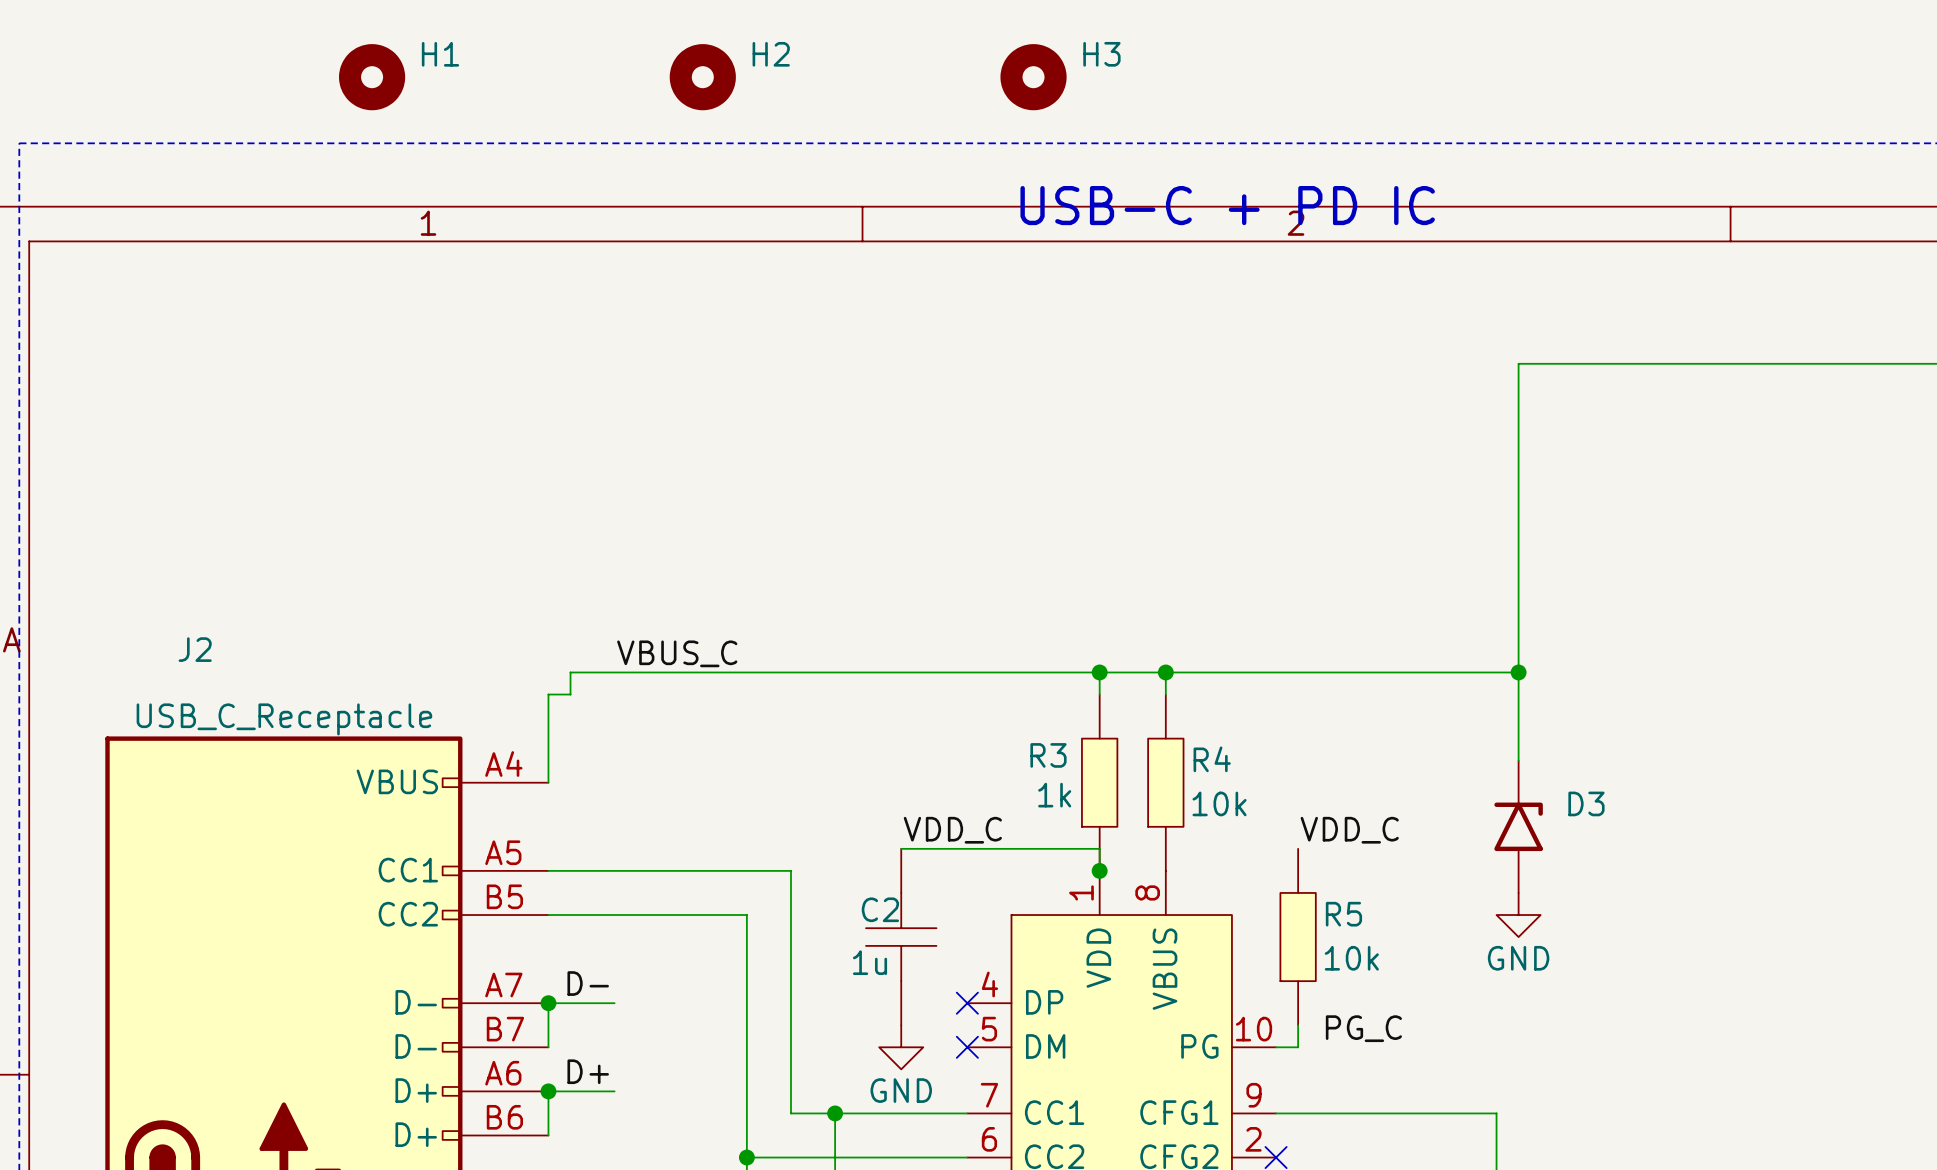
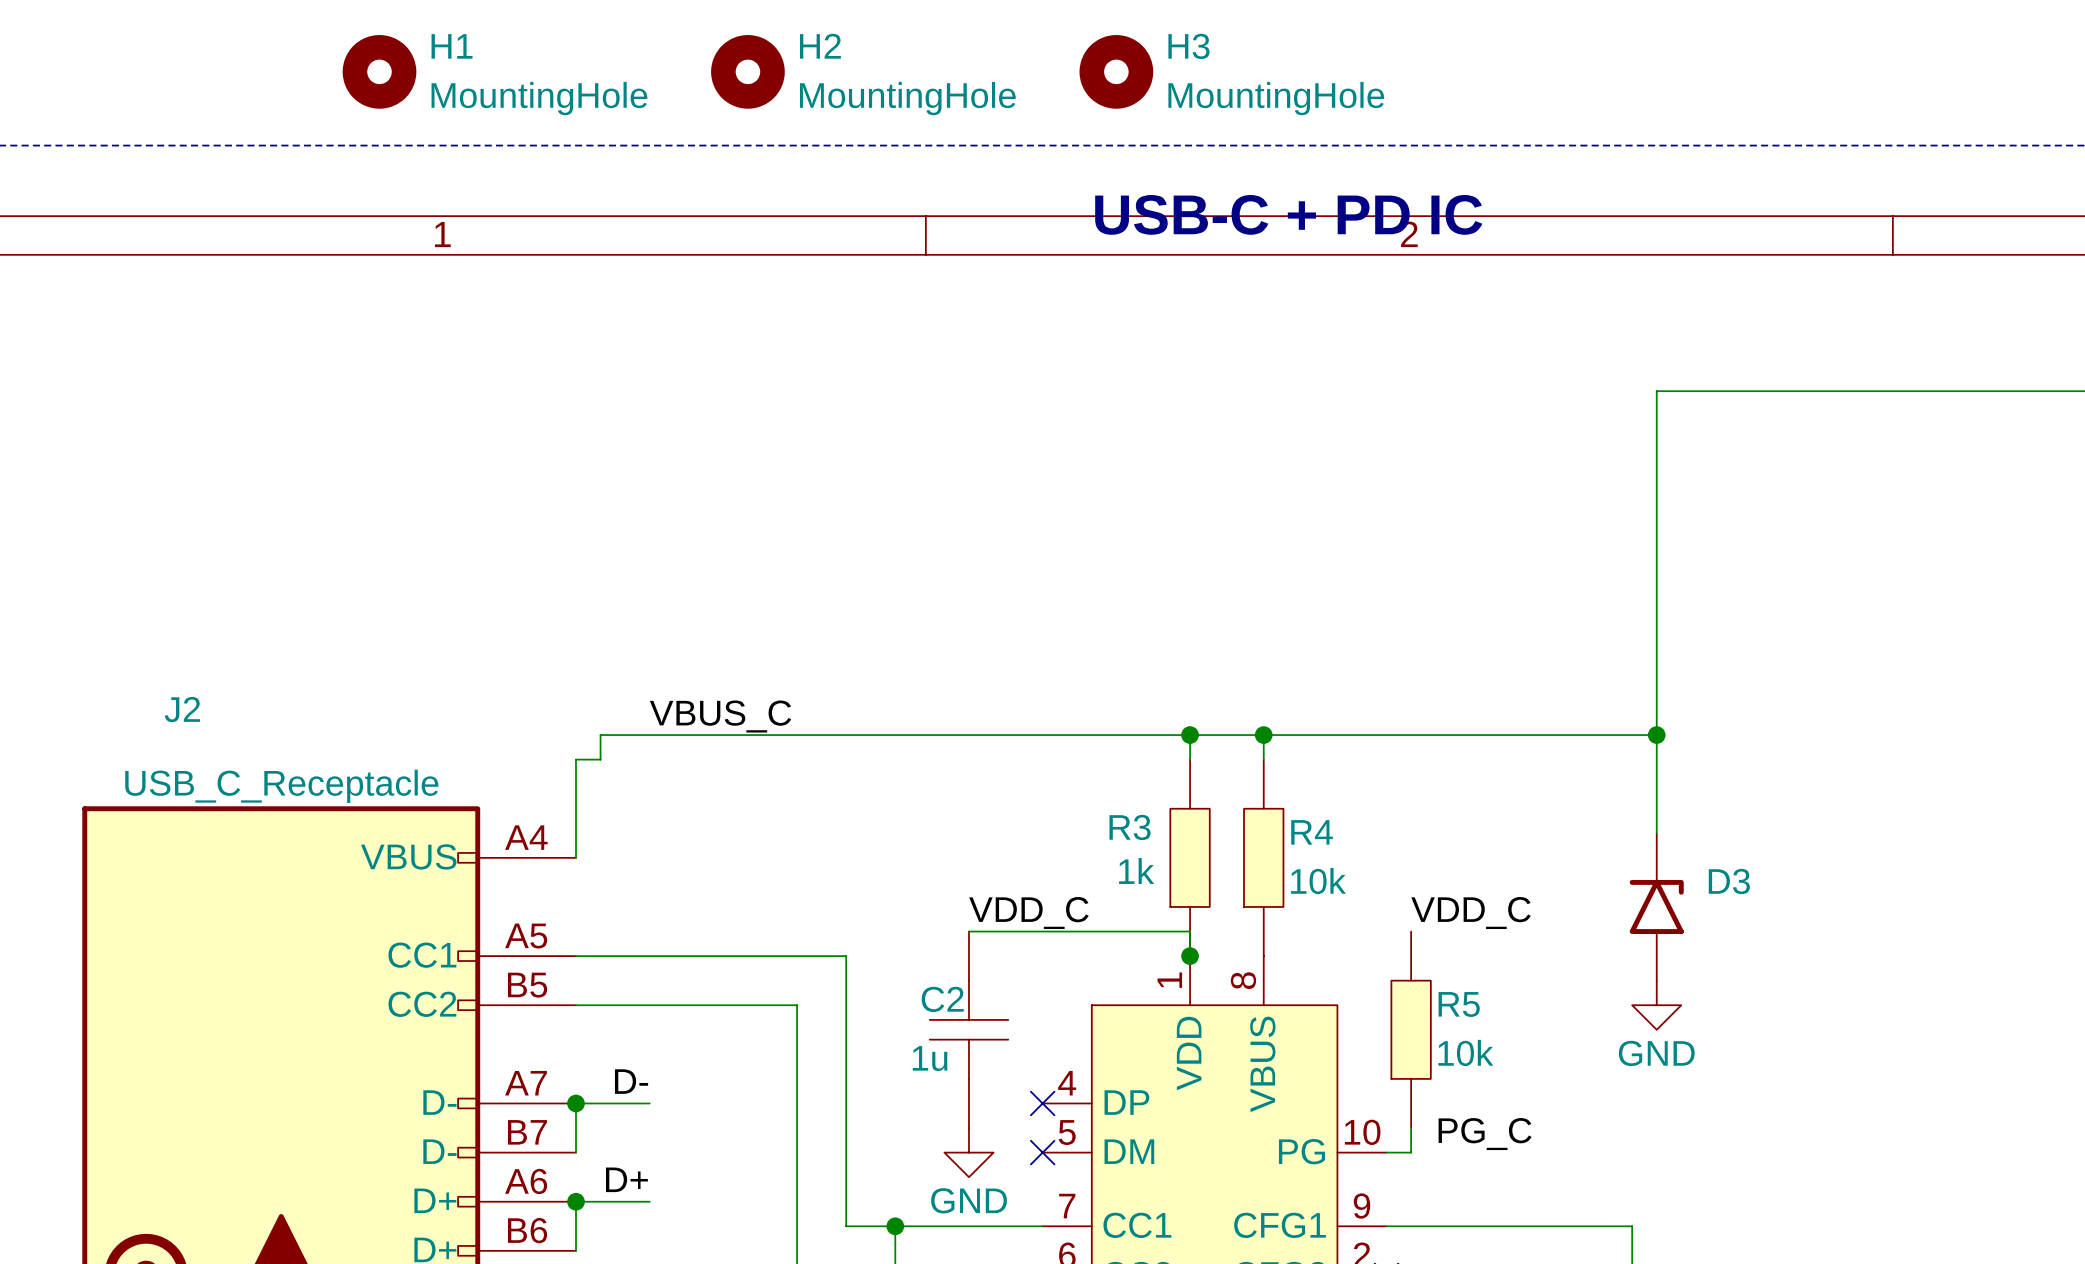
H1 value: none -> MountingHole (539, 98)
H2 value: none -> MountingHole (907, 98)
H3 value: none -> MountingHole (1276, 98)

